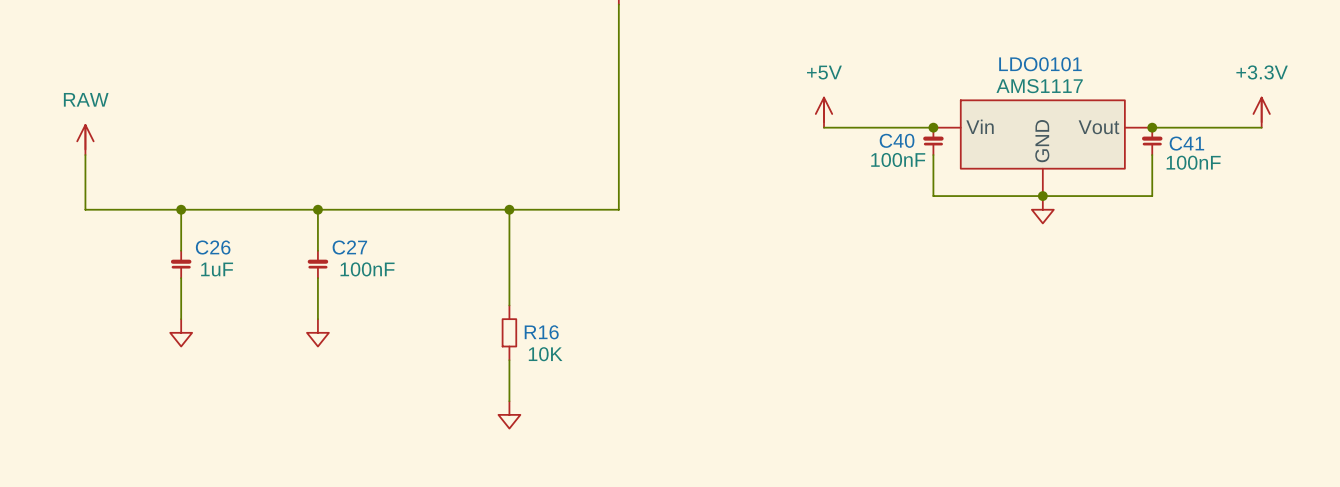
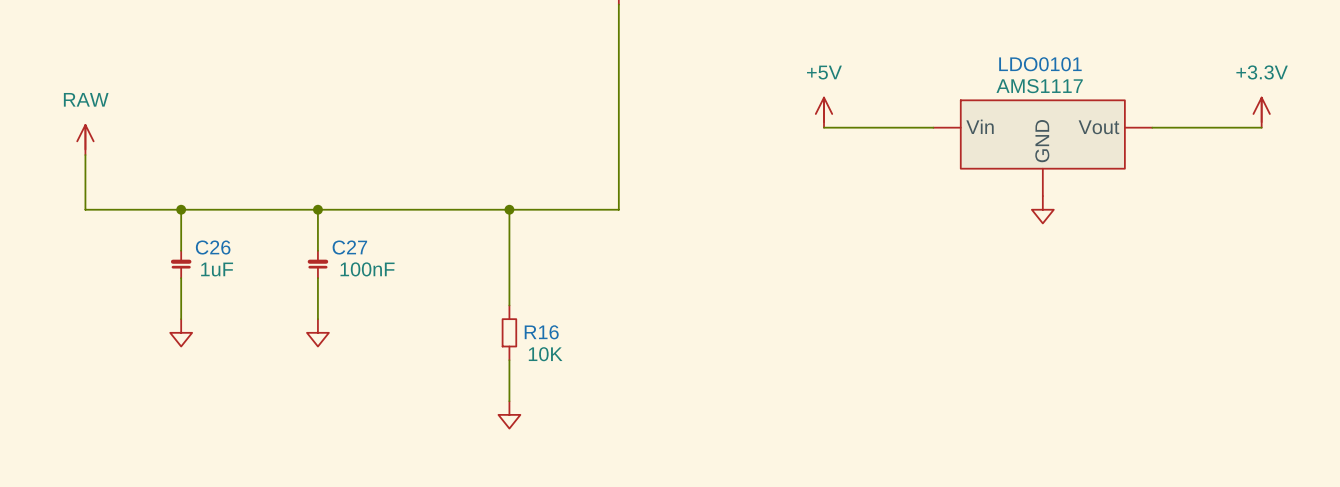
junction: (933, 127) -> none
junction: (1152, 127) -> none
C40: 100nF (933, 141) -> none
C41: 100nF (1152, 141) -> none
wire: (933, 155) (933, 196) (1152, 196) (1152, 155) -> none
junction: (1042, 196) -> none

